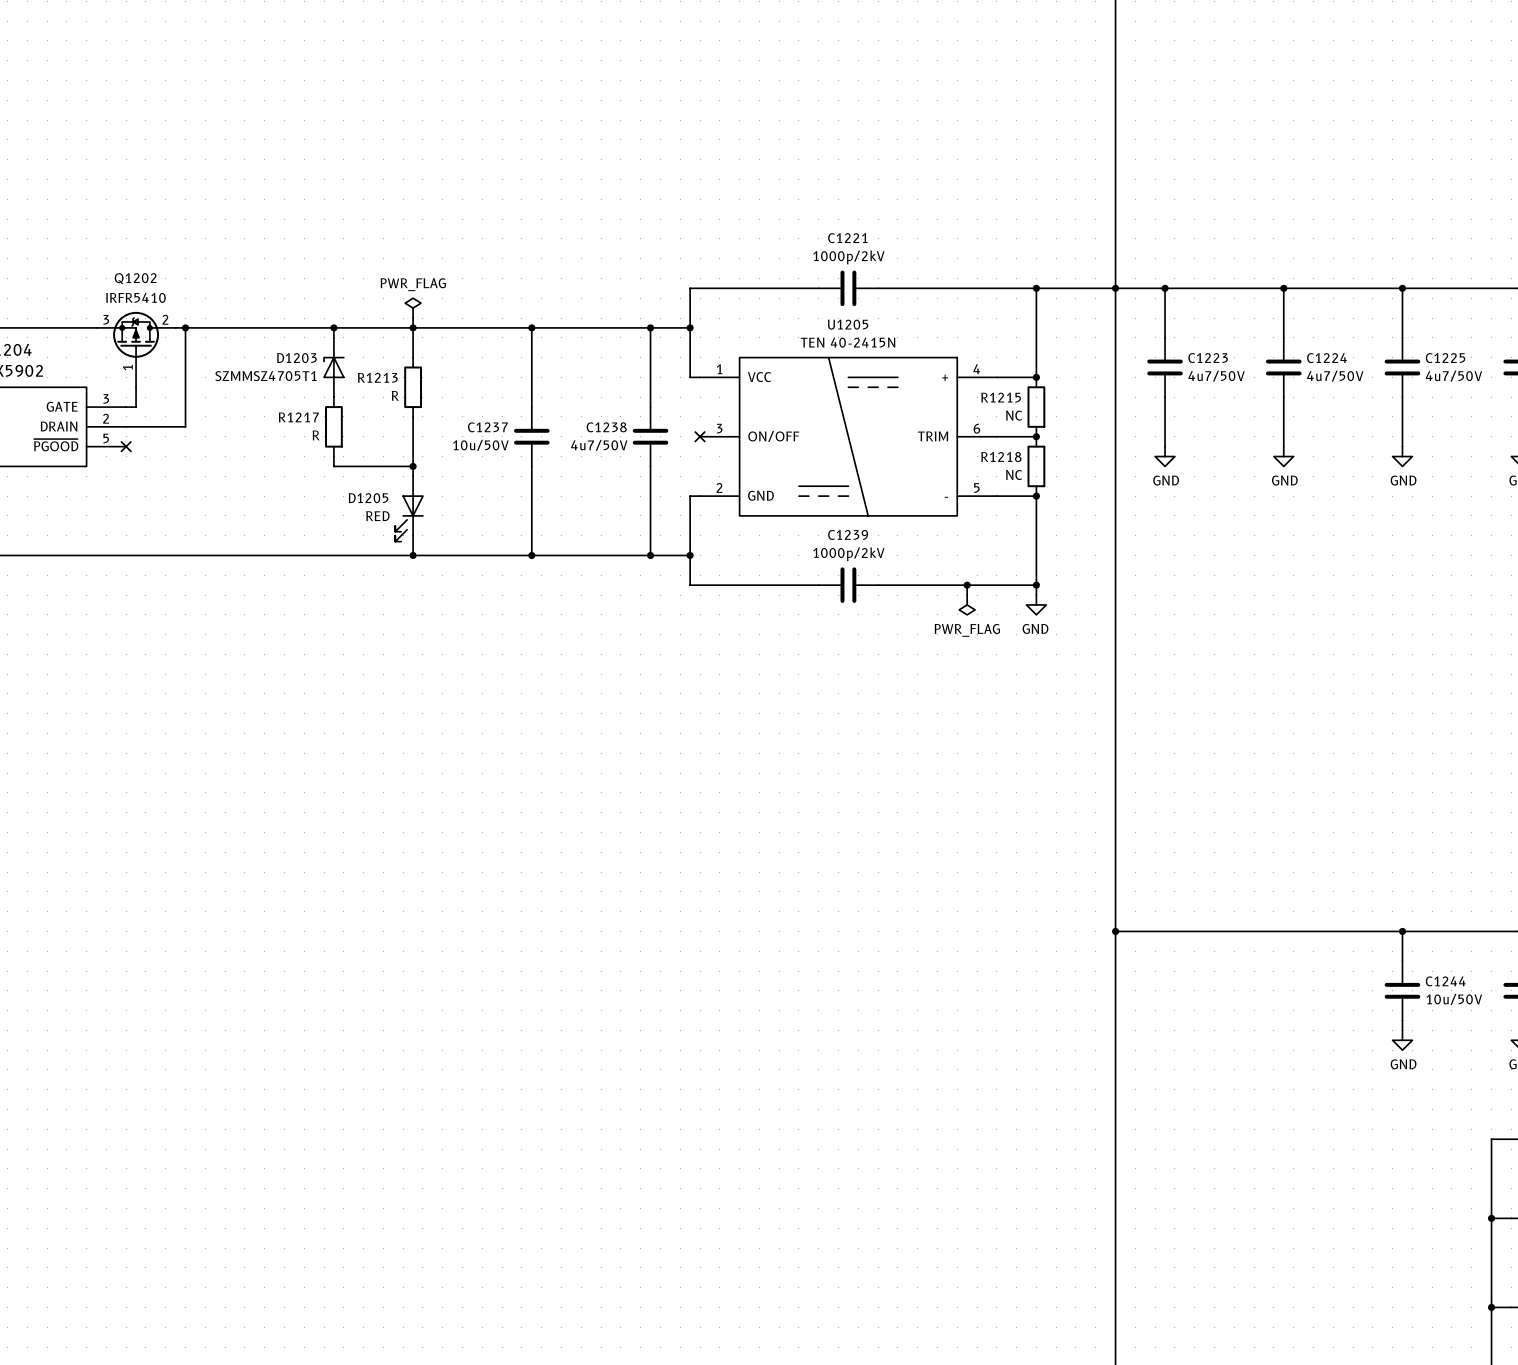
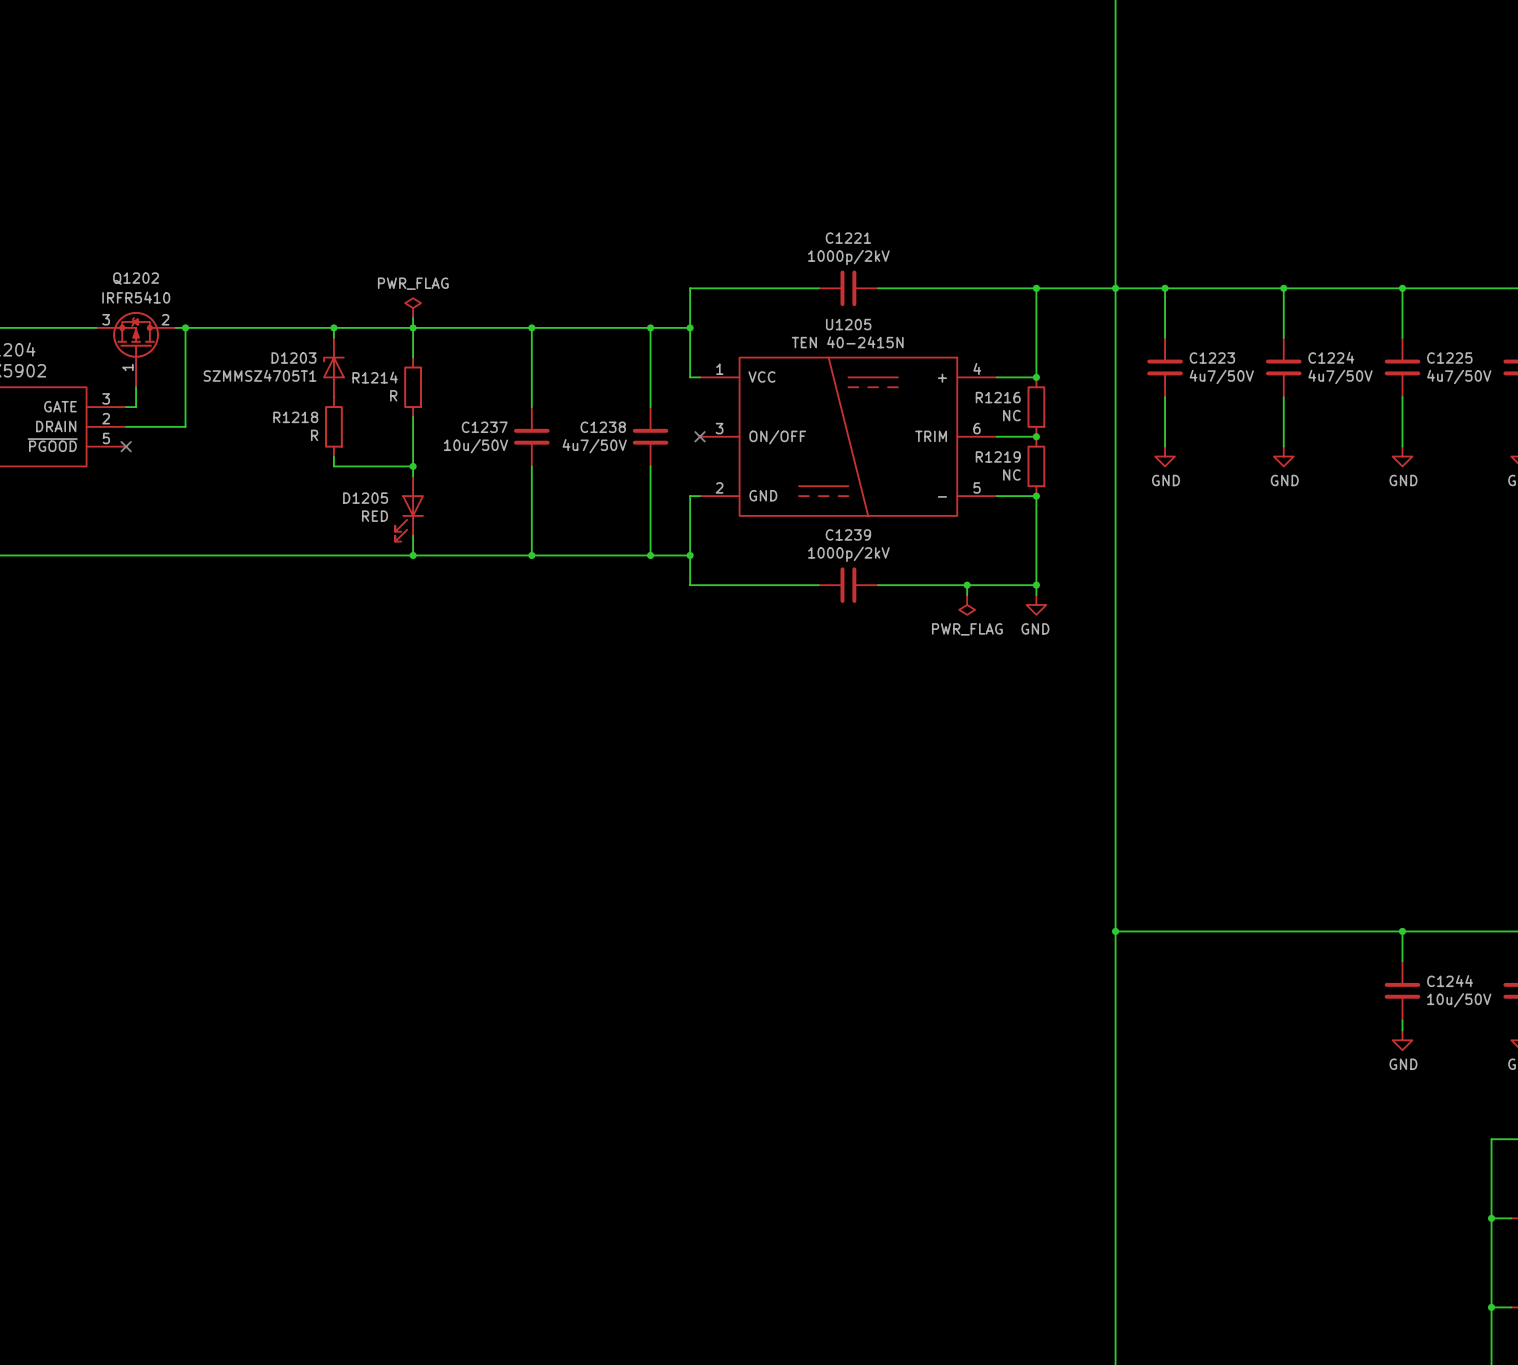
R1213 name: R1213 (377, 377) -> R1214 (375, 377)
R1215 name: R1215 (1001, 397) -> R1216 (998, 397)
R1217 name: R1217 (298, 417) -> R1218 (295, 417)
R1218 name: R1218 (1001, 457) -> R1219 (998, 456)

